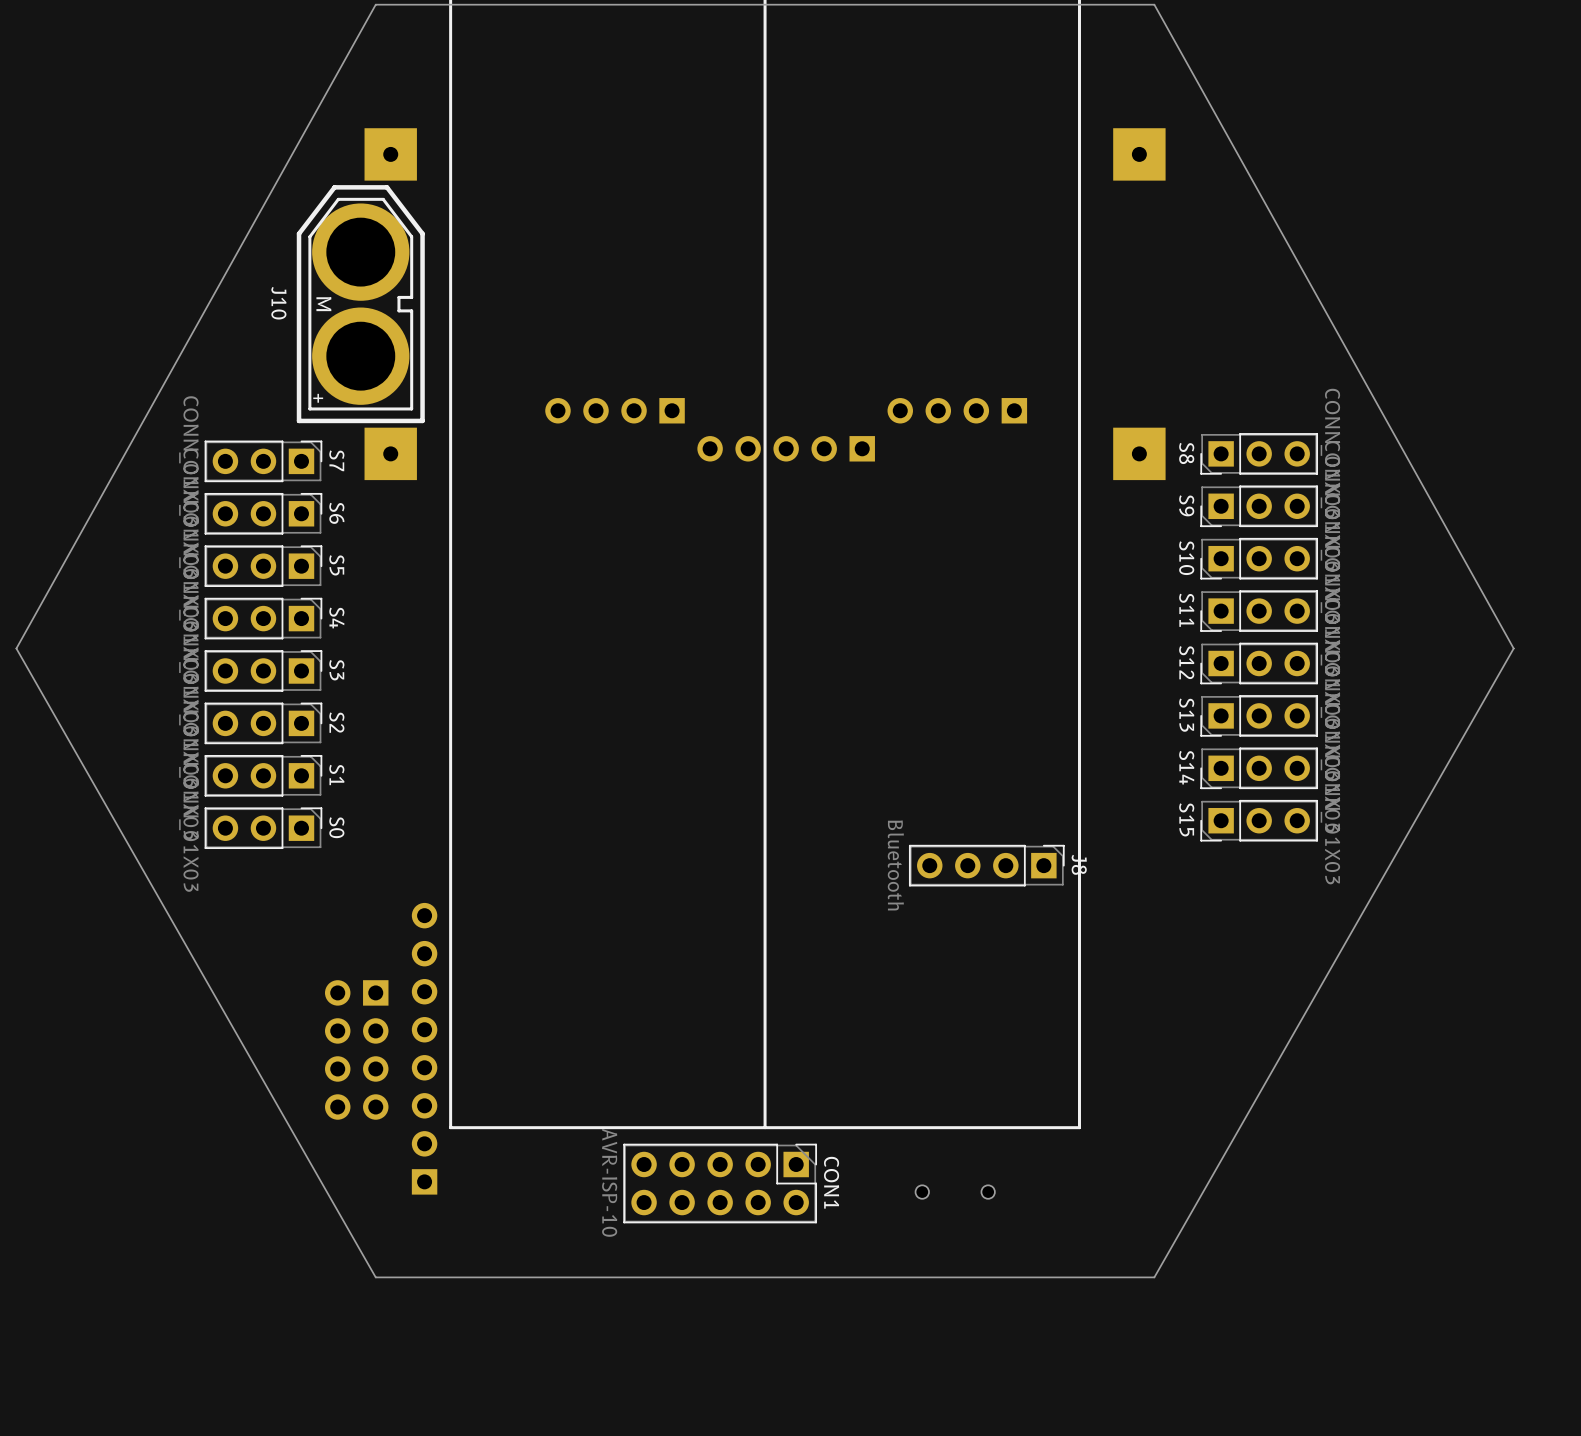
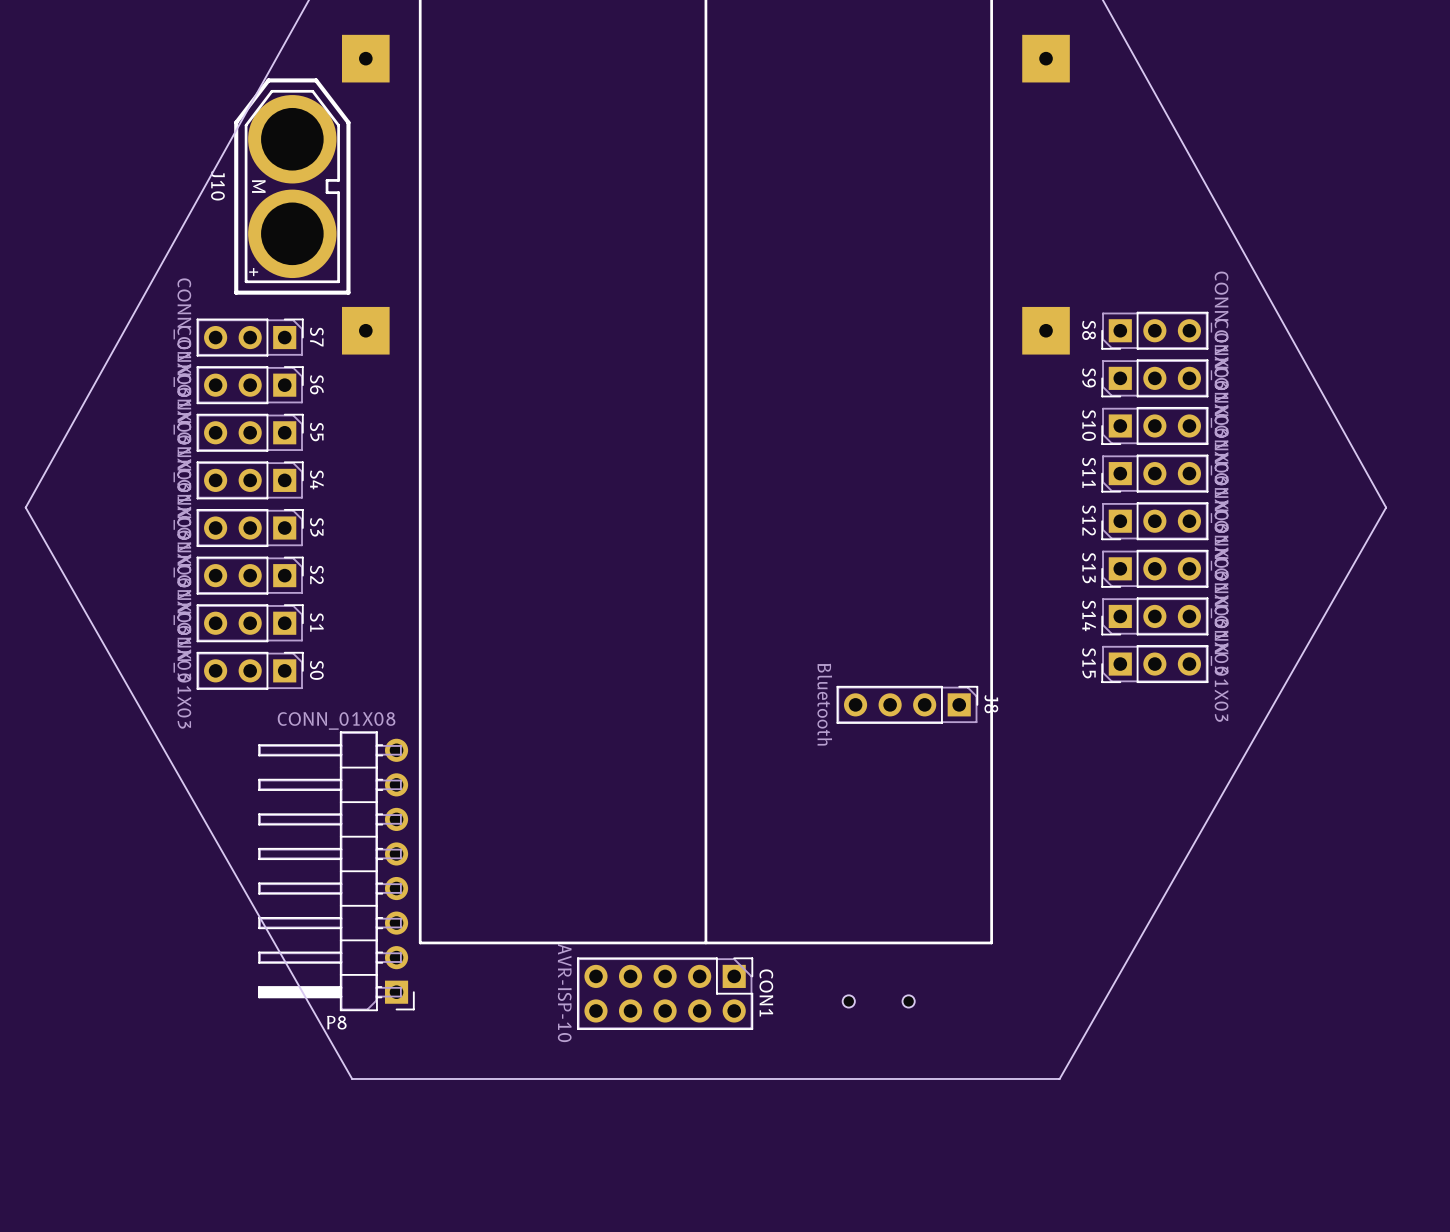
J10 position: (360, 304) -> (292, 186)
part: (615, 410) -> none
part: (957, 410) -> none
part: (786, 448) -> none
P8 side: top (424, 1048) -> bottom (336, 871)
part: (356, 1049) -> none

